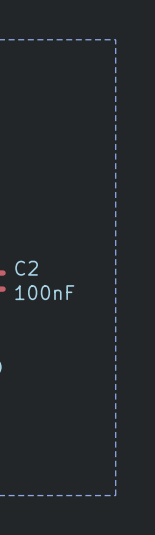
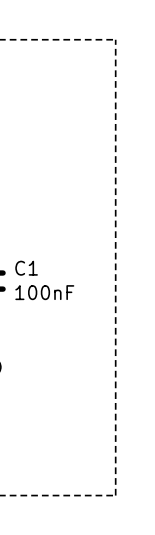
C2 name: C2 (26, 268) -> C1 (26, 268)

